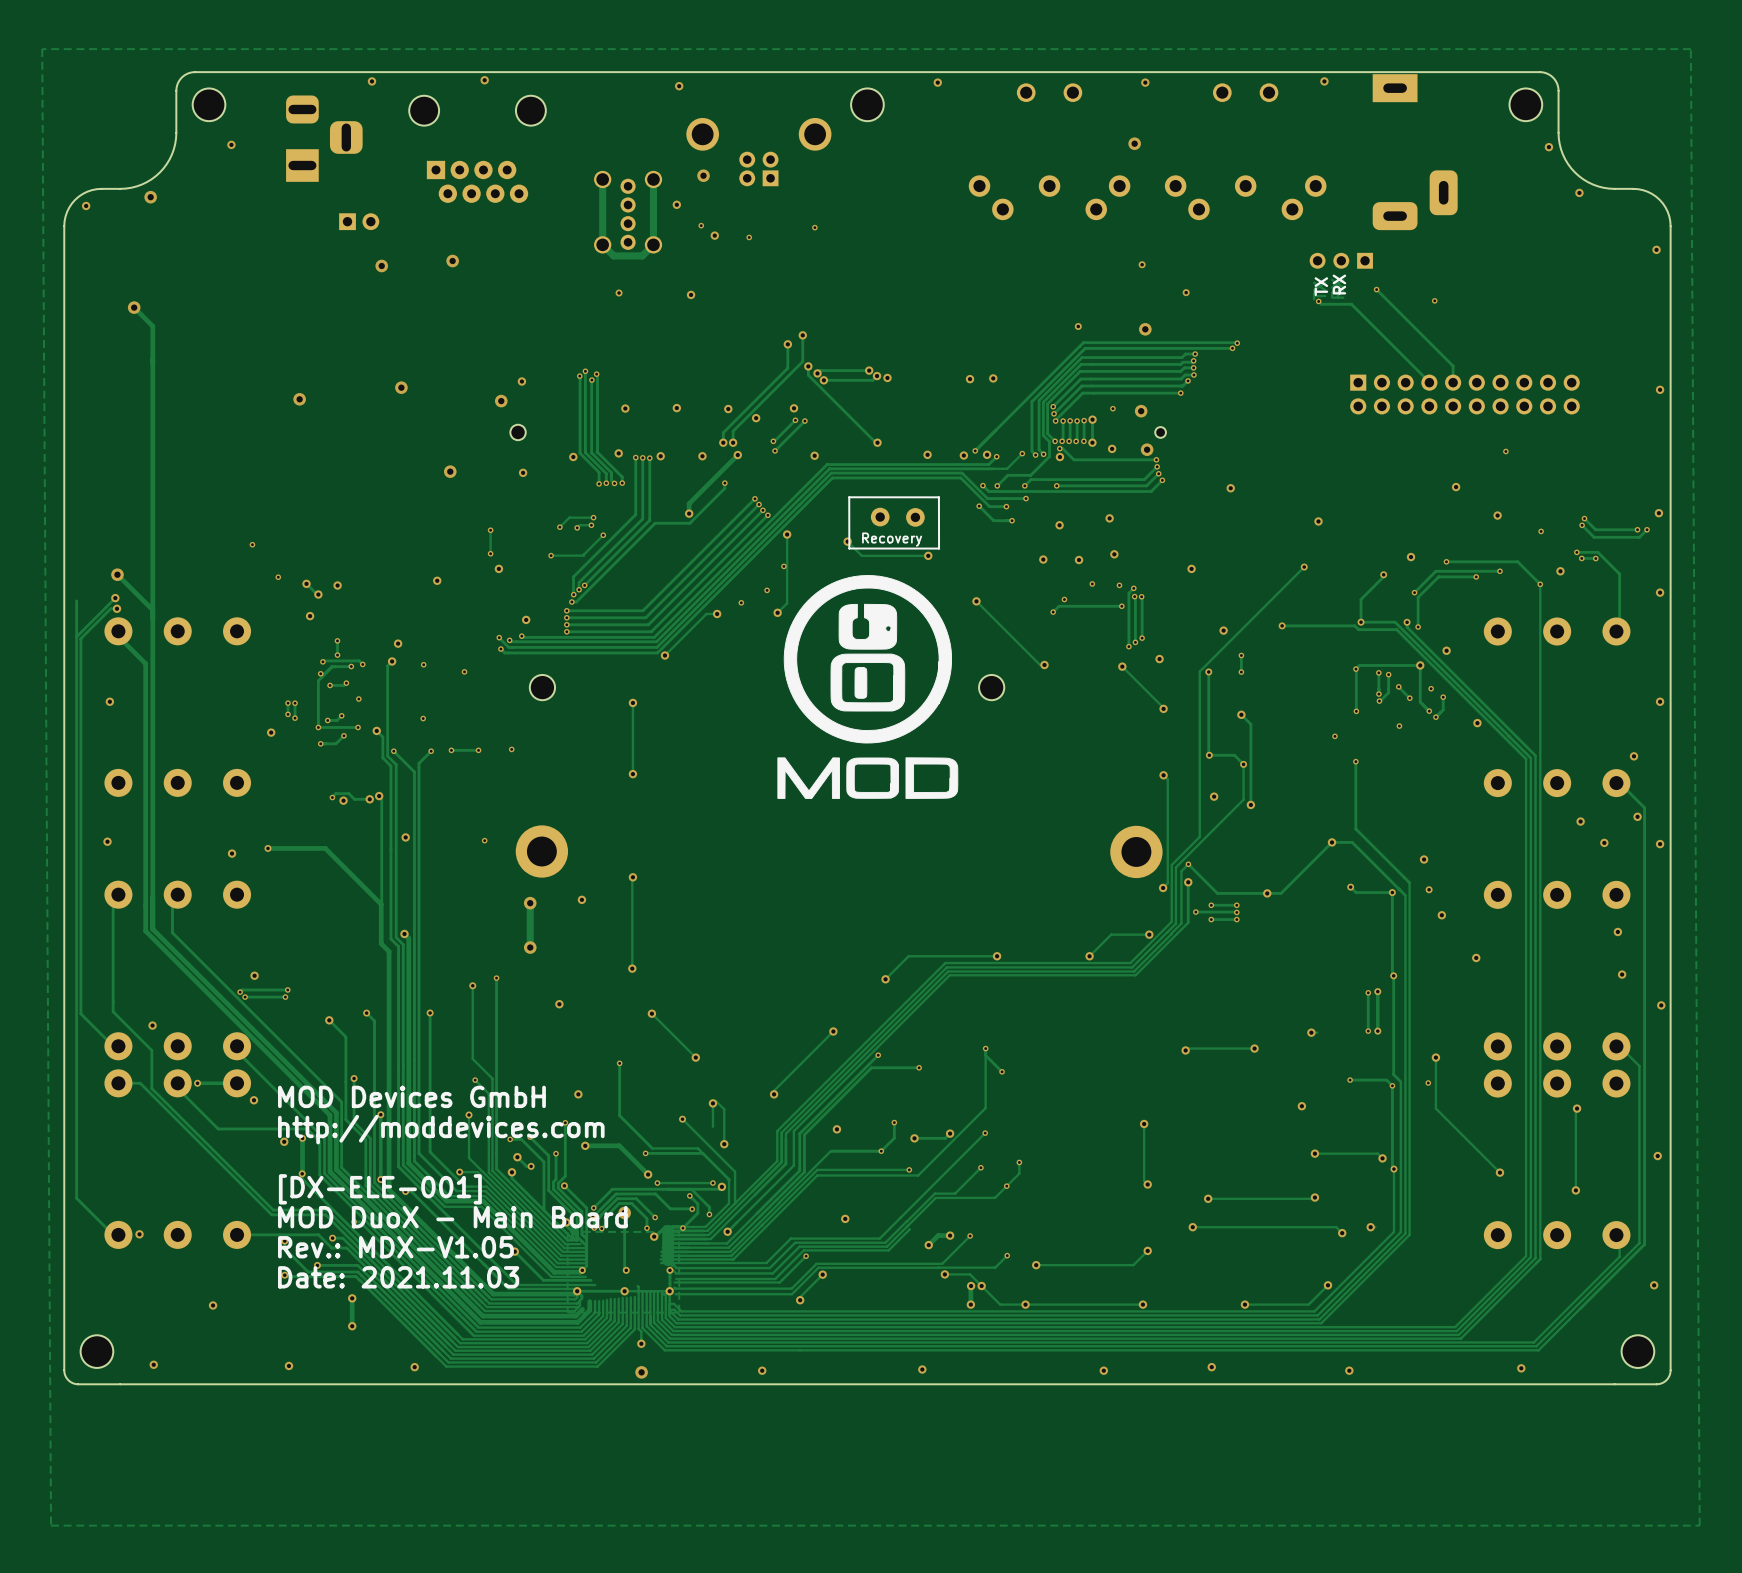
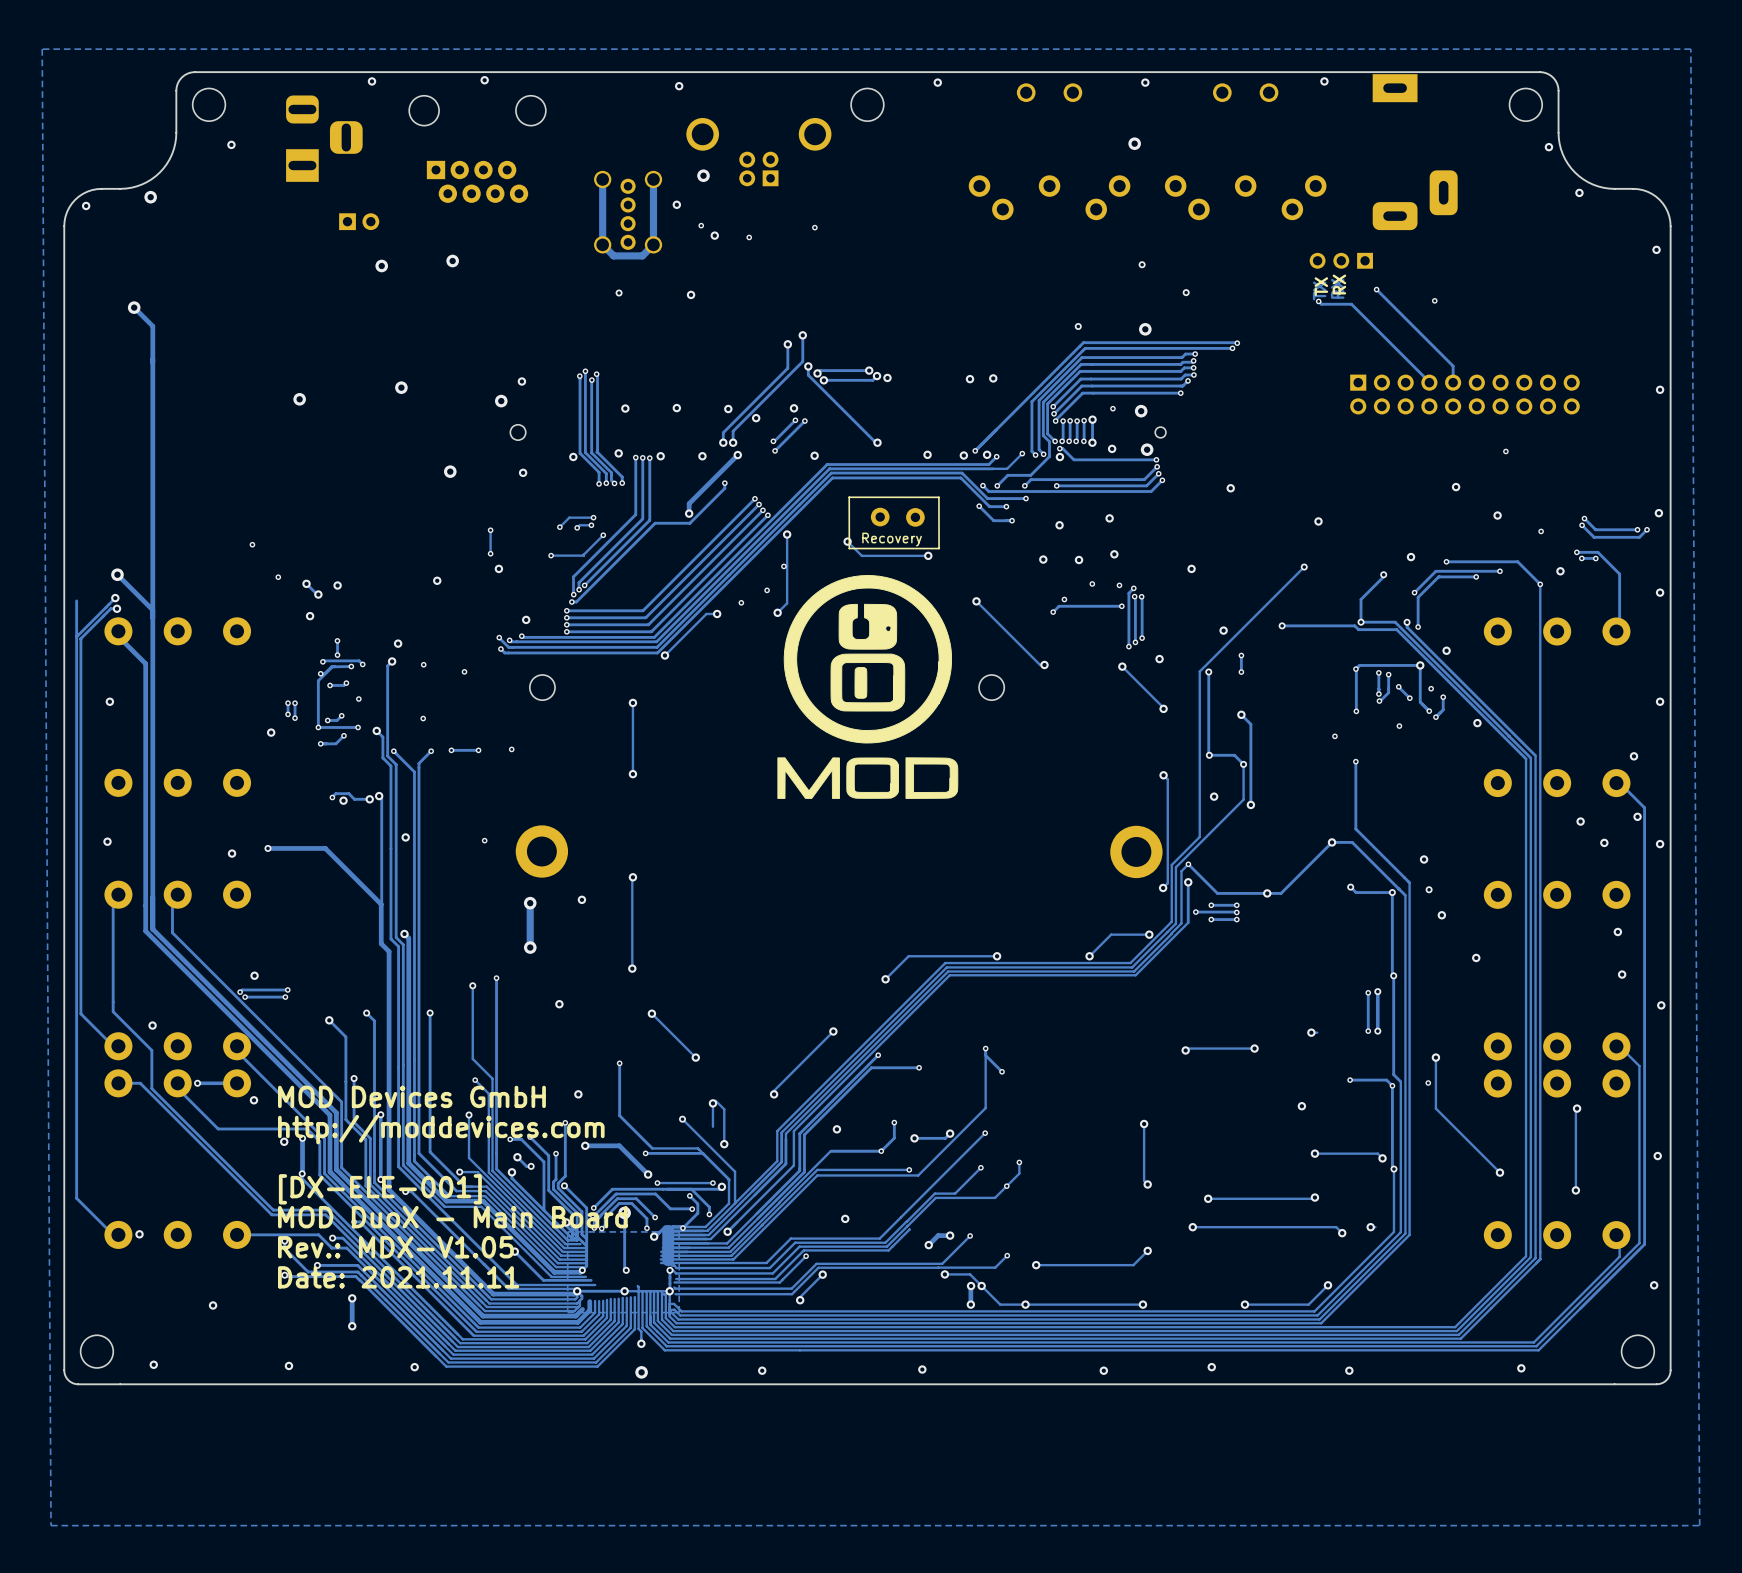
text: Date: 2021.11.03 (398, 1277) -> Date: 2021.11.11 (398, 1277)

